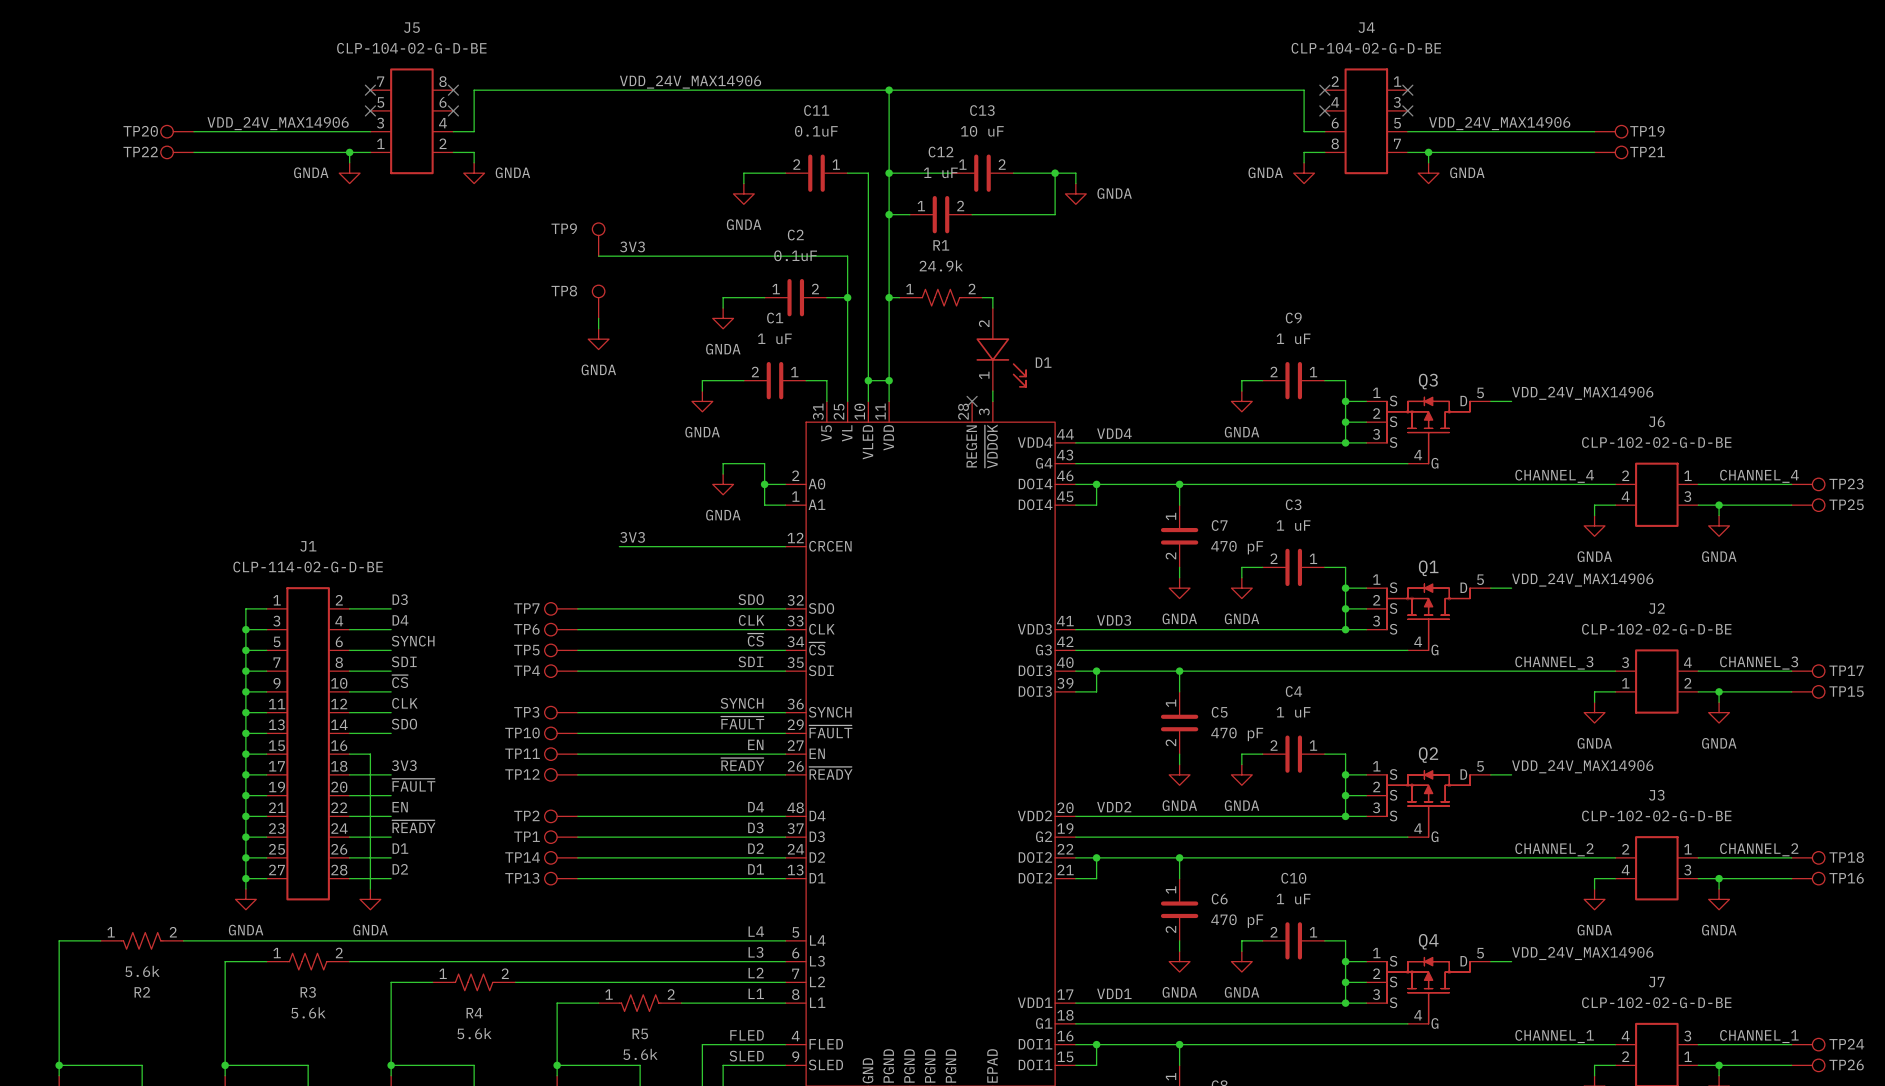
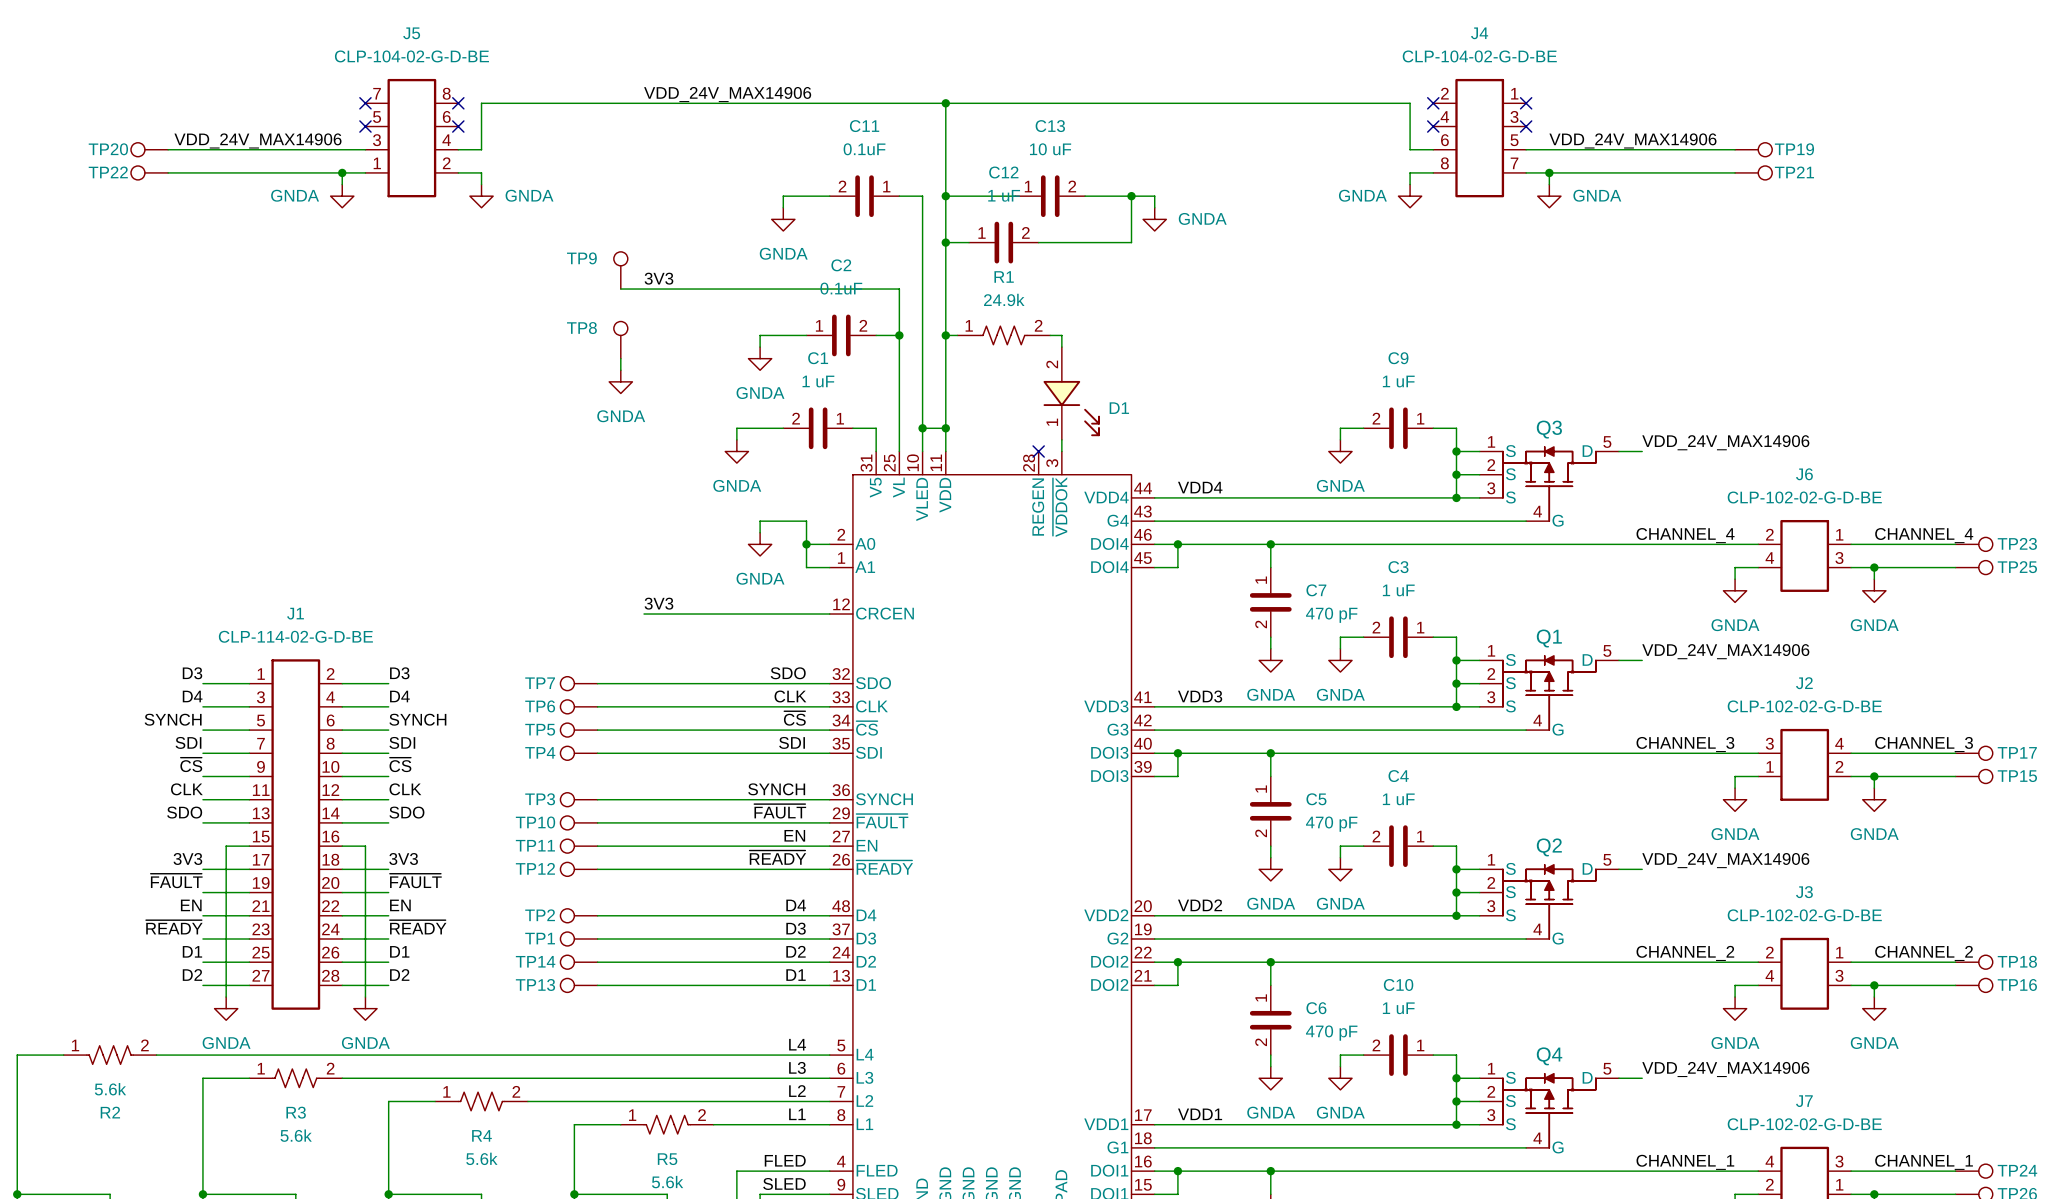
label: none -> D3 (192, 673)
wire: (245, 608) (245, 754) -> (226, 683) (202, 683)
label: none -> D4 (192, 696)
wire: none -> (202, 706) (226, 706)
junction: (245, 629) -> none
label: none -> SYNCH (173, 719)
wire: none -> (202, 730) (226, 730)
junction: (245, 650) -> none
label: none -> SDI (188, 742)
wire: none -> (202, 753) (226, 753)
junction: (245, 671) -> none
label: none -> ~{CS} (191, 764)
wire: none -> (202, 776) (226, 776)
junction: (245, 691) -> none
label: none -> CLK (186, 789)
wire: none -> (202, 799) (226, 799)
junction: (245, 712) -> none
label: none -> SDO (184, 812)
wire: none -> (202, 822) (226, 822)
junction: (245, 733) -> none
junction: (245, 754) -> none
label: none -> 3V3 (187, 858)
wire: none -> (202, 869) (226, 869)
junction: (245, 774) -> none
label: none -> ~{FAULT} (176, 880)
wire: none -> (202, 892) (226, 892)
junction: (245, 795) -> none
label: none -> EN (191, 905)
wire: none -> (202, 915) (226, 915)
junction: (245, 816) -> none
label: none -> ~{READY} (174, 927)
wire: none -> (202, 938) (226, 938)
junction: (245, 837) -> none
label: none -> D1 (192, 951)
wire: none -> (202, 962) (226, 962)
junction: (245, 857) -> none
label: none -> D2 (192, 974)
wire: none -> (202, 985) (226, 985)
junction: (245, 878) -> none

